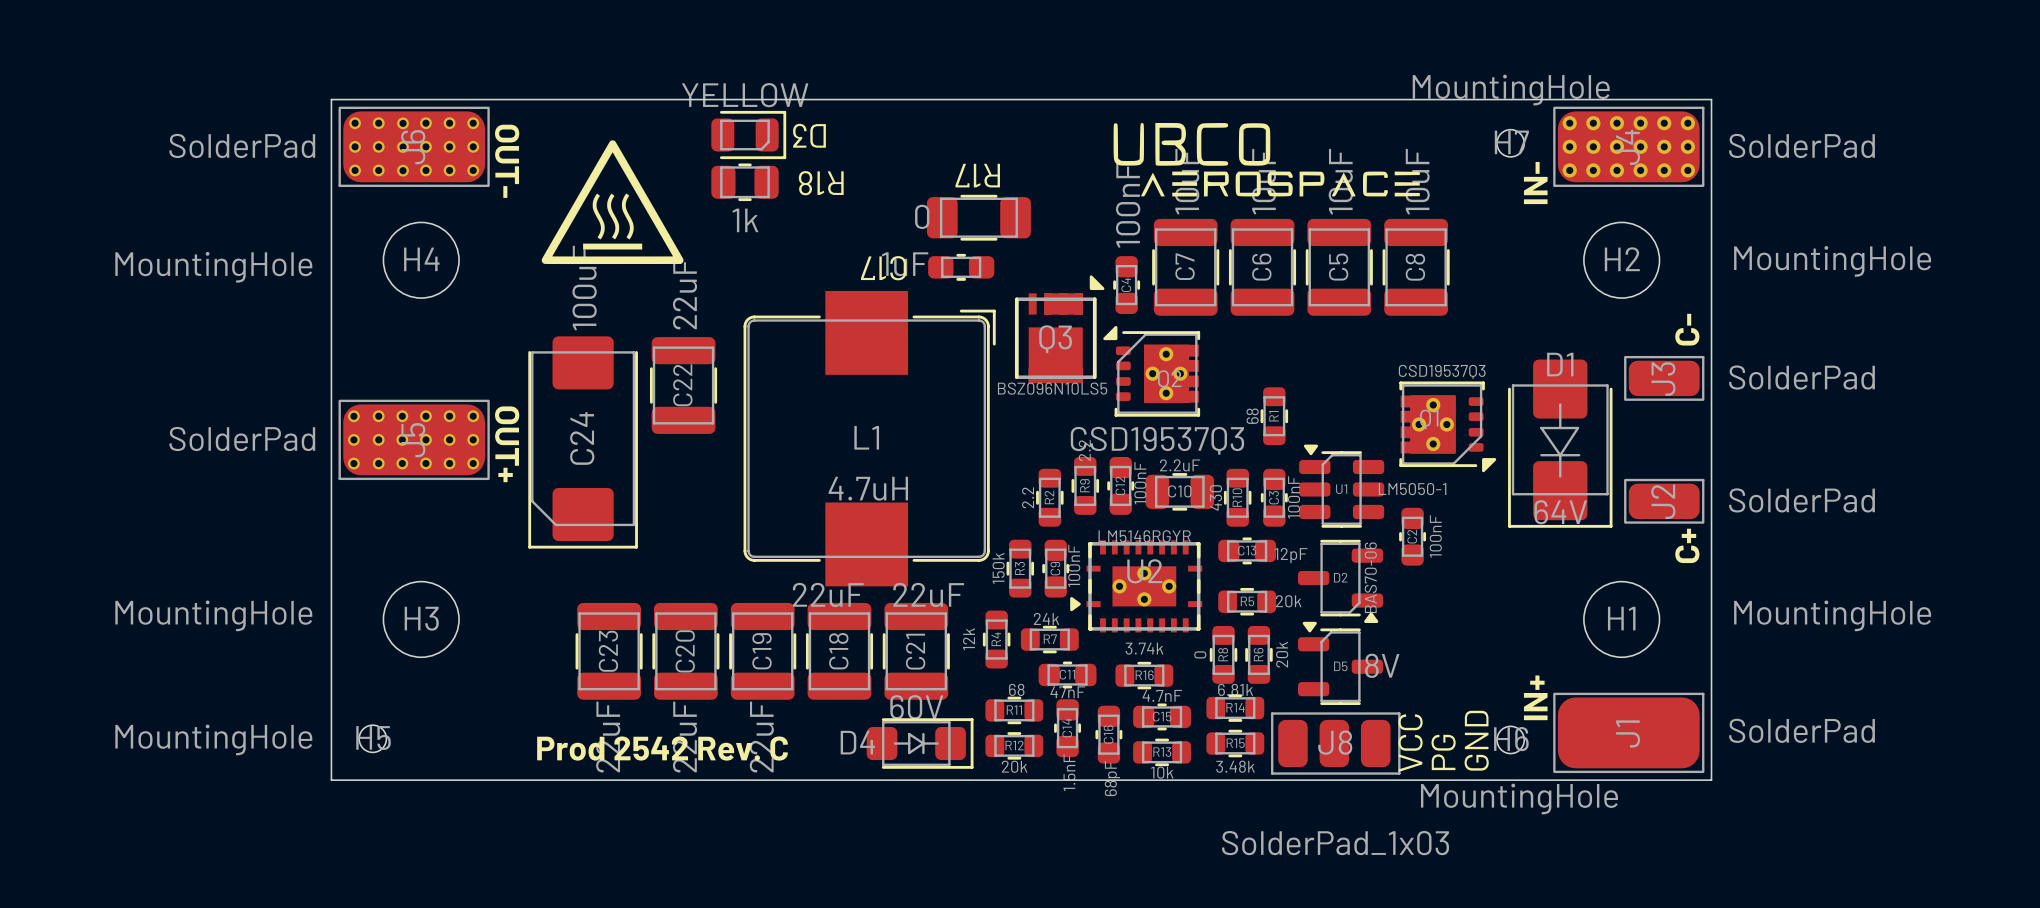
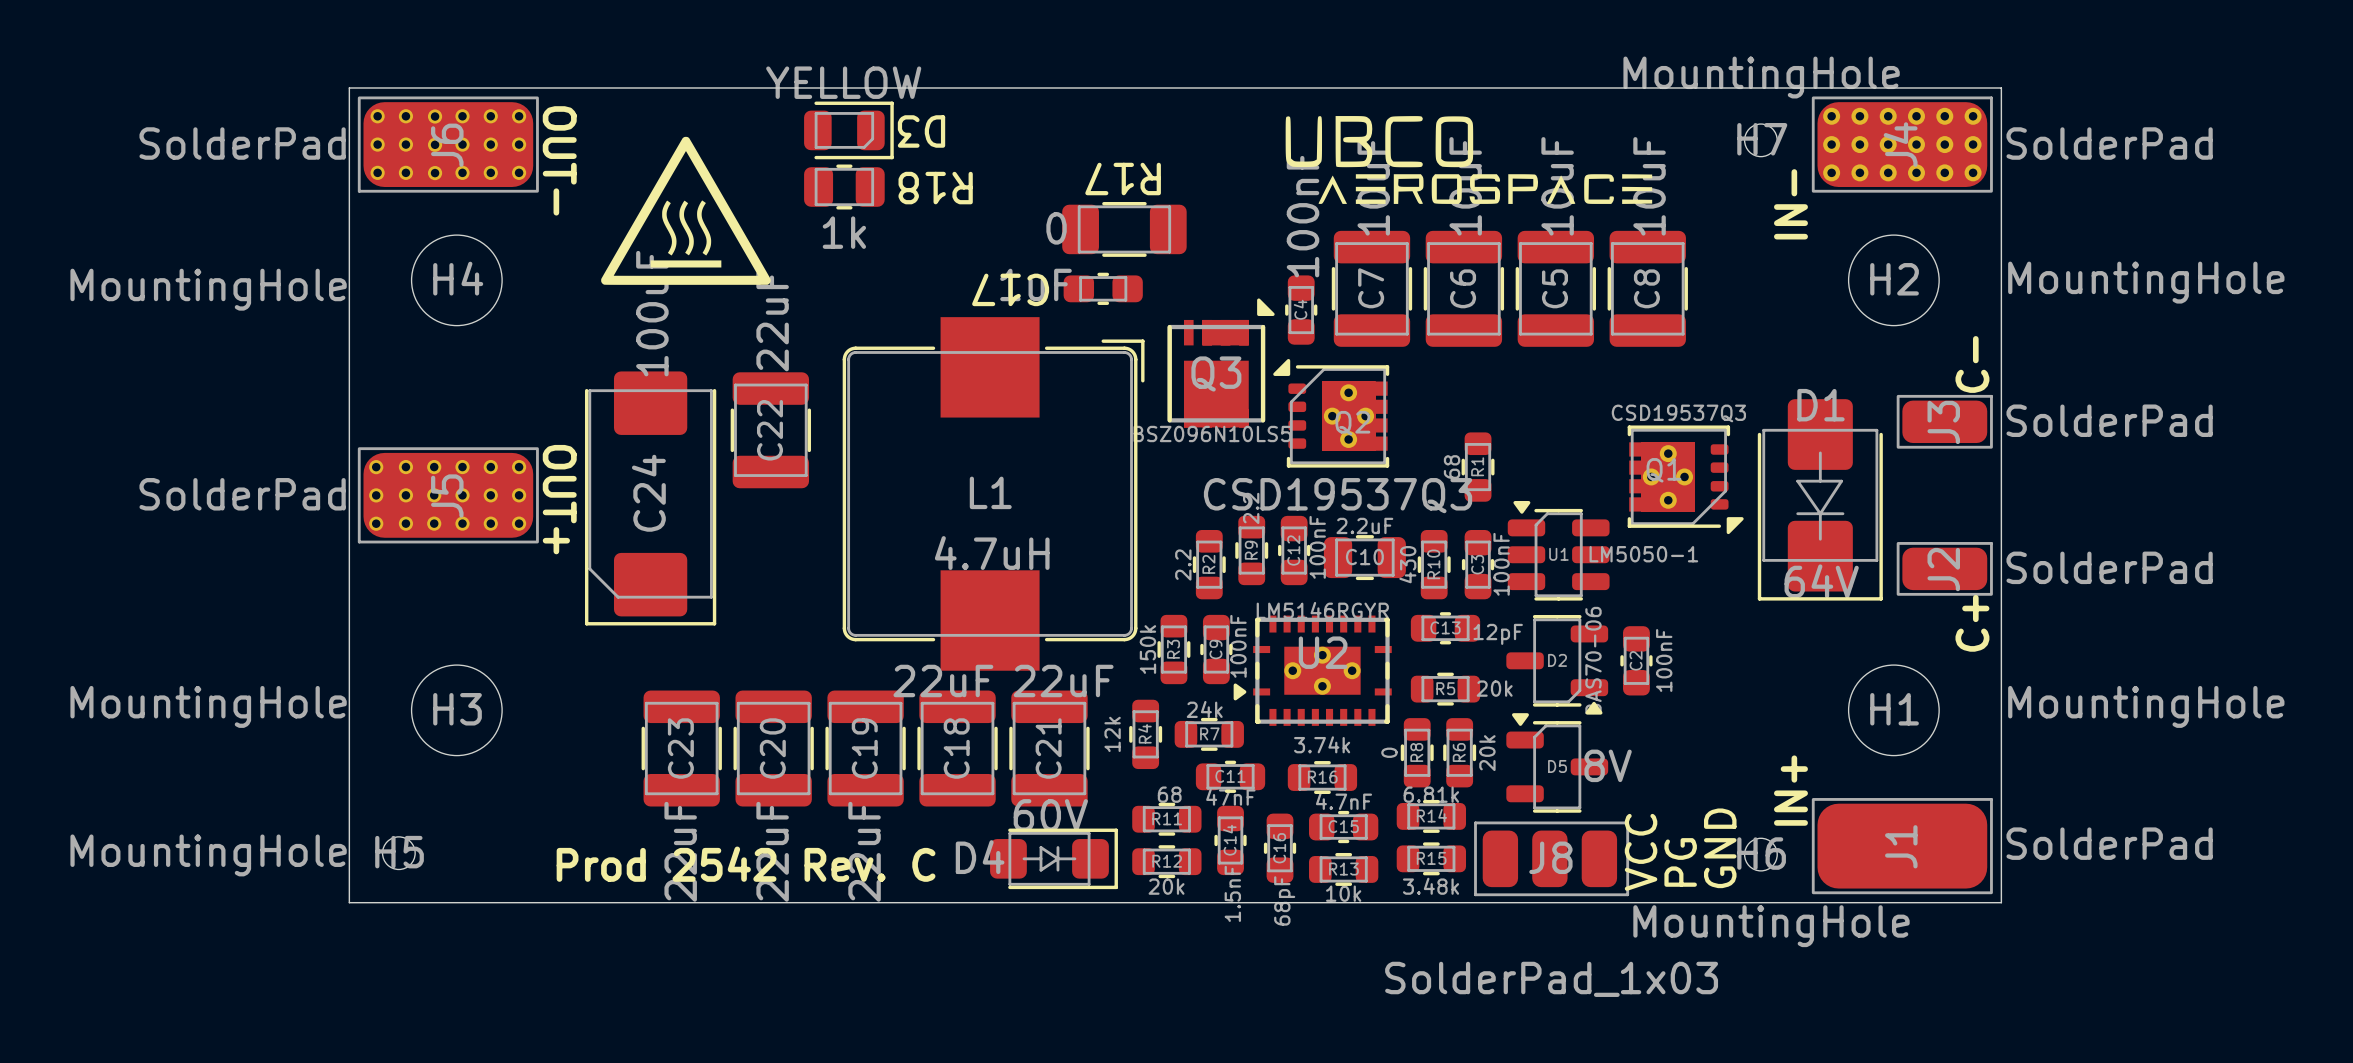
C2 position: (1412, 536) -> (1636, 660)

